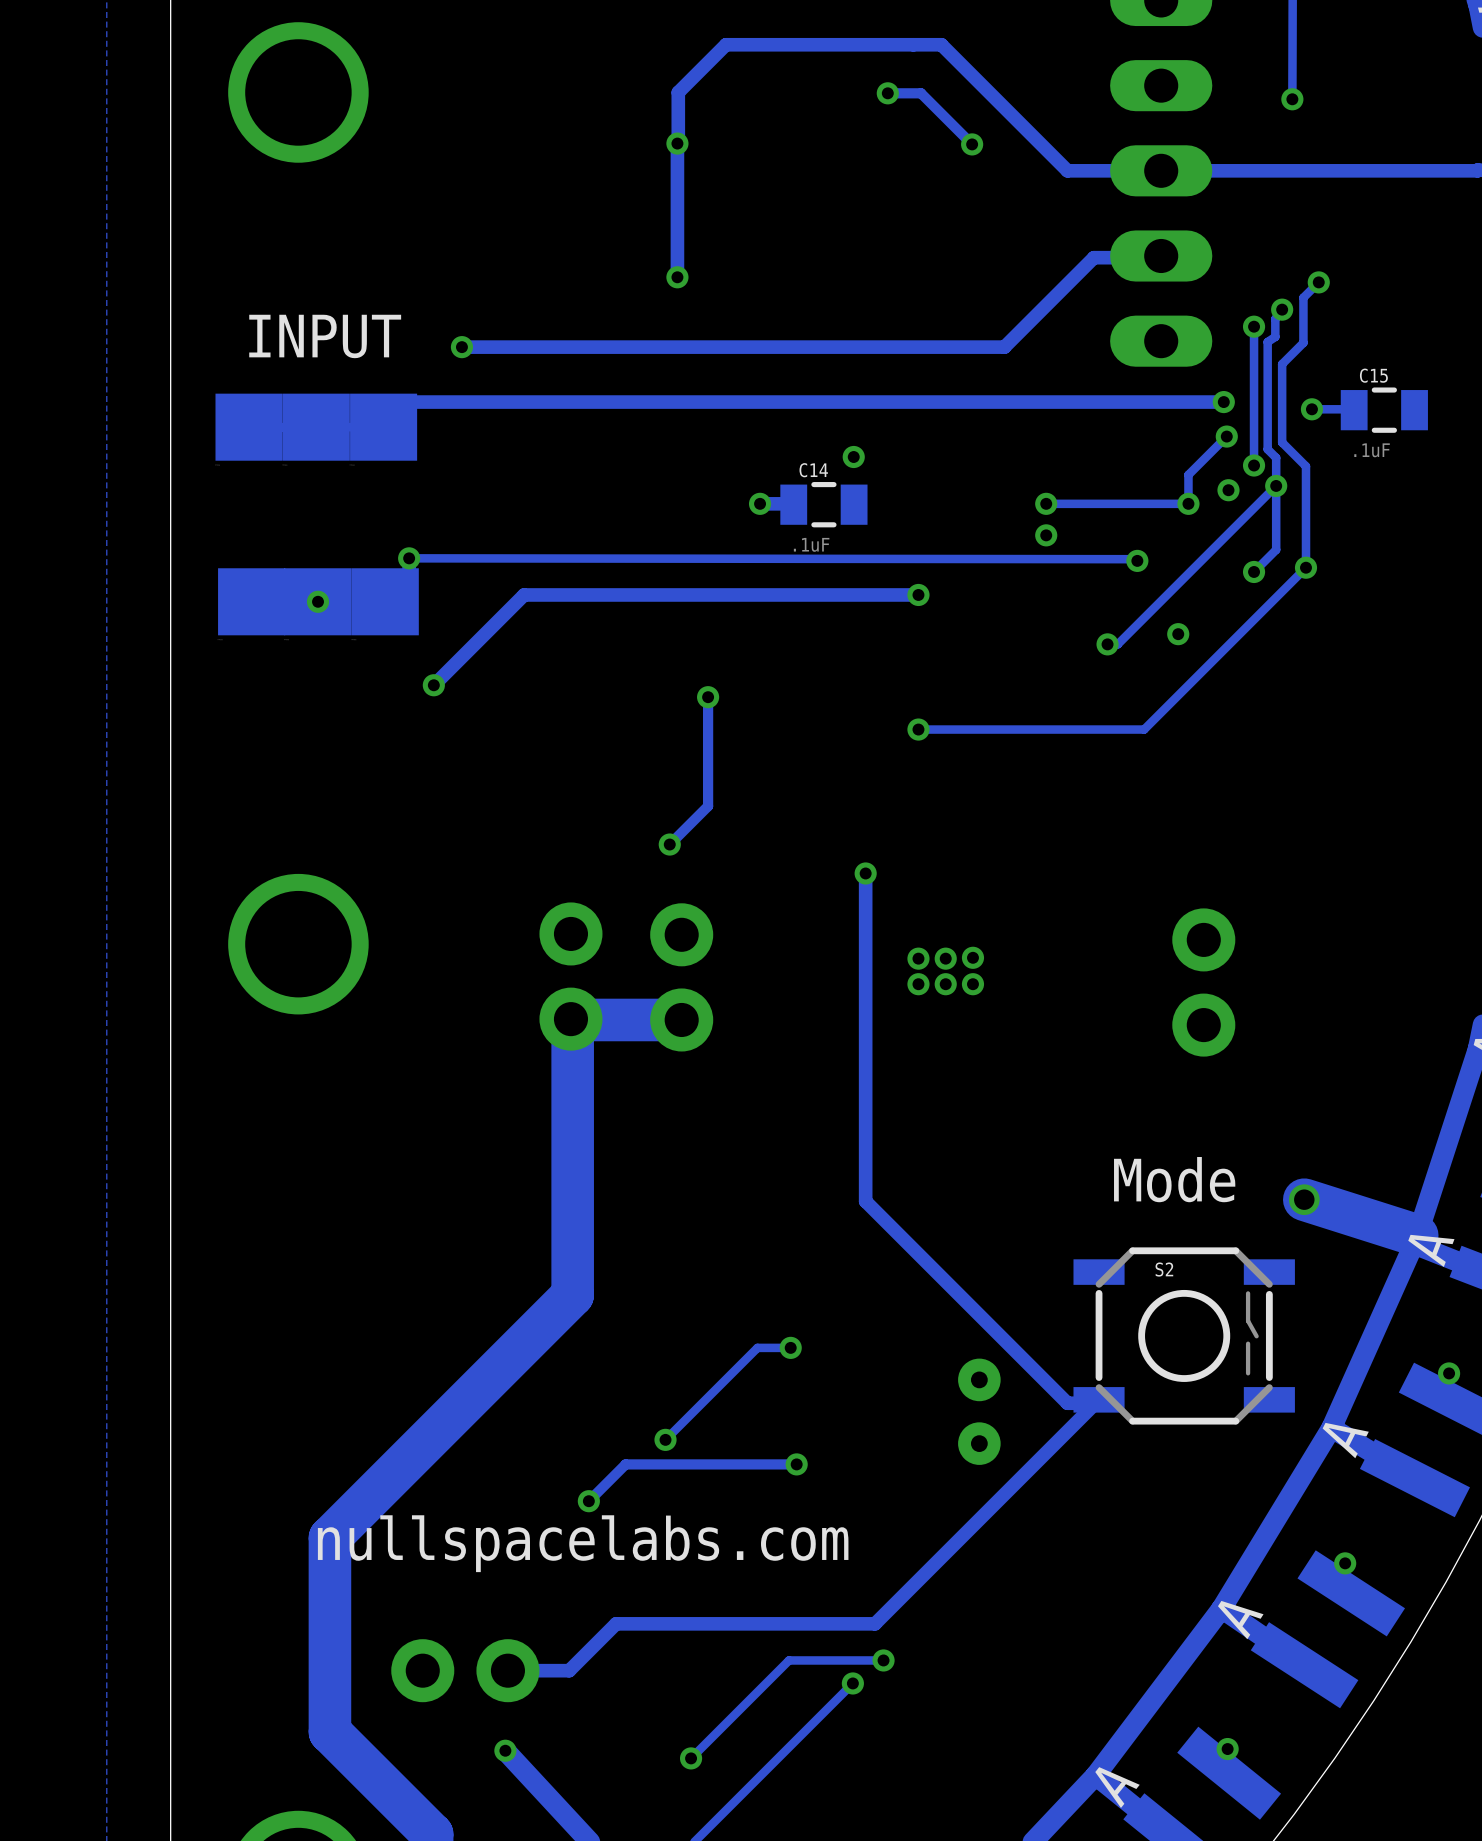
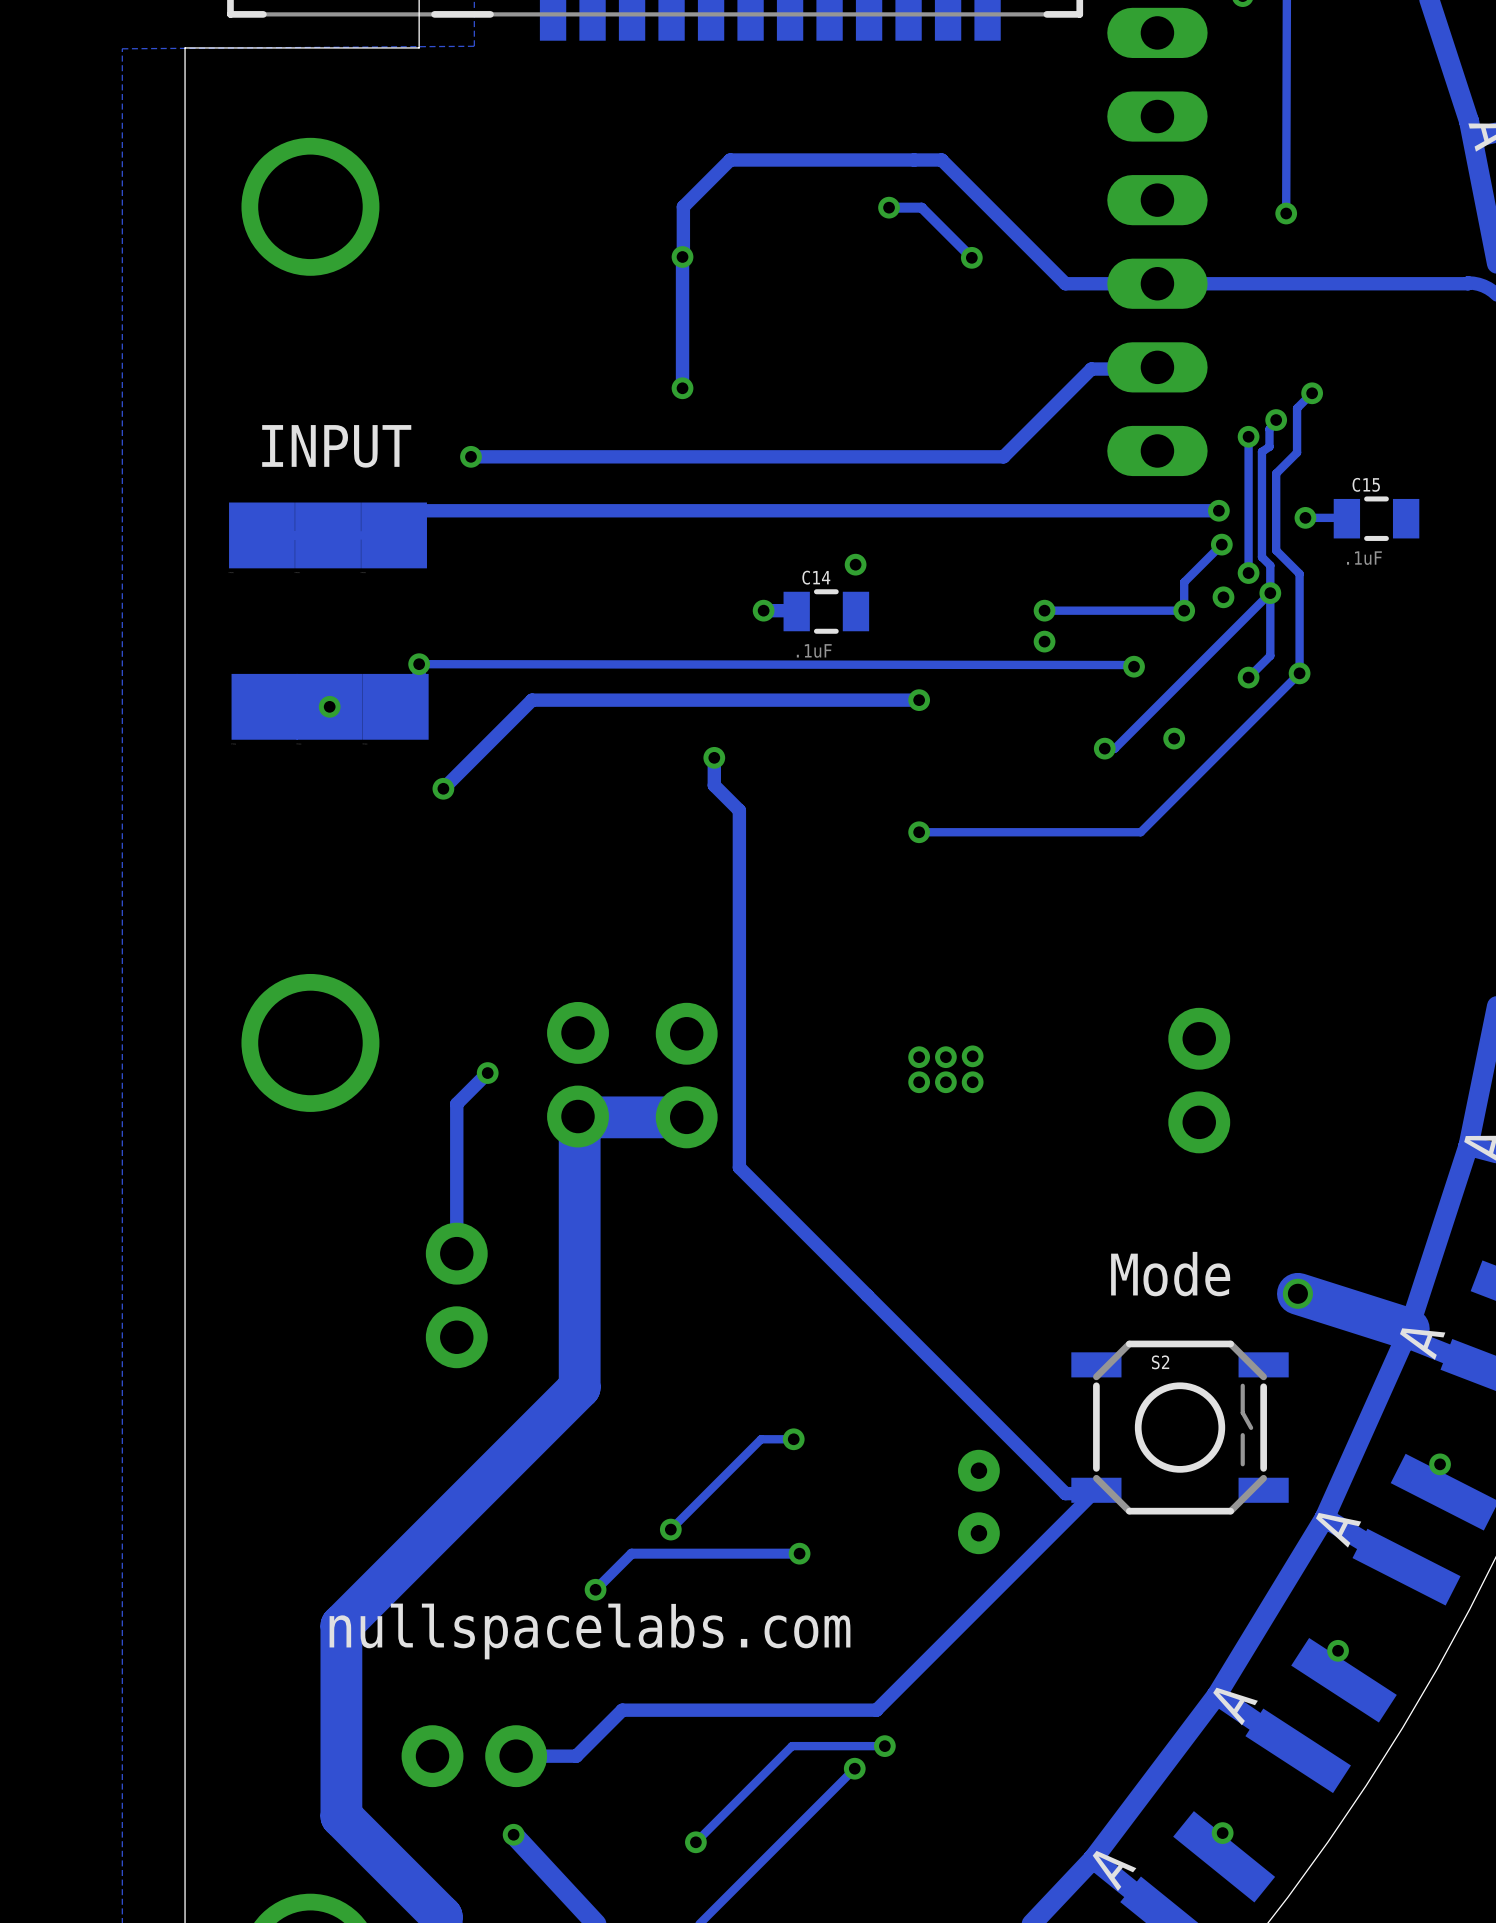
track: (708, 697) (708, 806) (669, 844) -> none
via position: (708, 697) -> (714, 757)
via: (669, 844) -> none
track: (865, 873) (865, 1201) -> (714, 757) (714, 785) (739, 810) (739, 1167) (867, 1295)
via: (865, 873) -> none
track: none -> (487, 1073) (456, 1103) (456, 1253)
via: none -> (487, 1073)
part: none -> (456, 1295)

